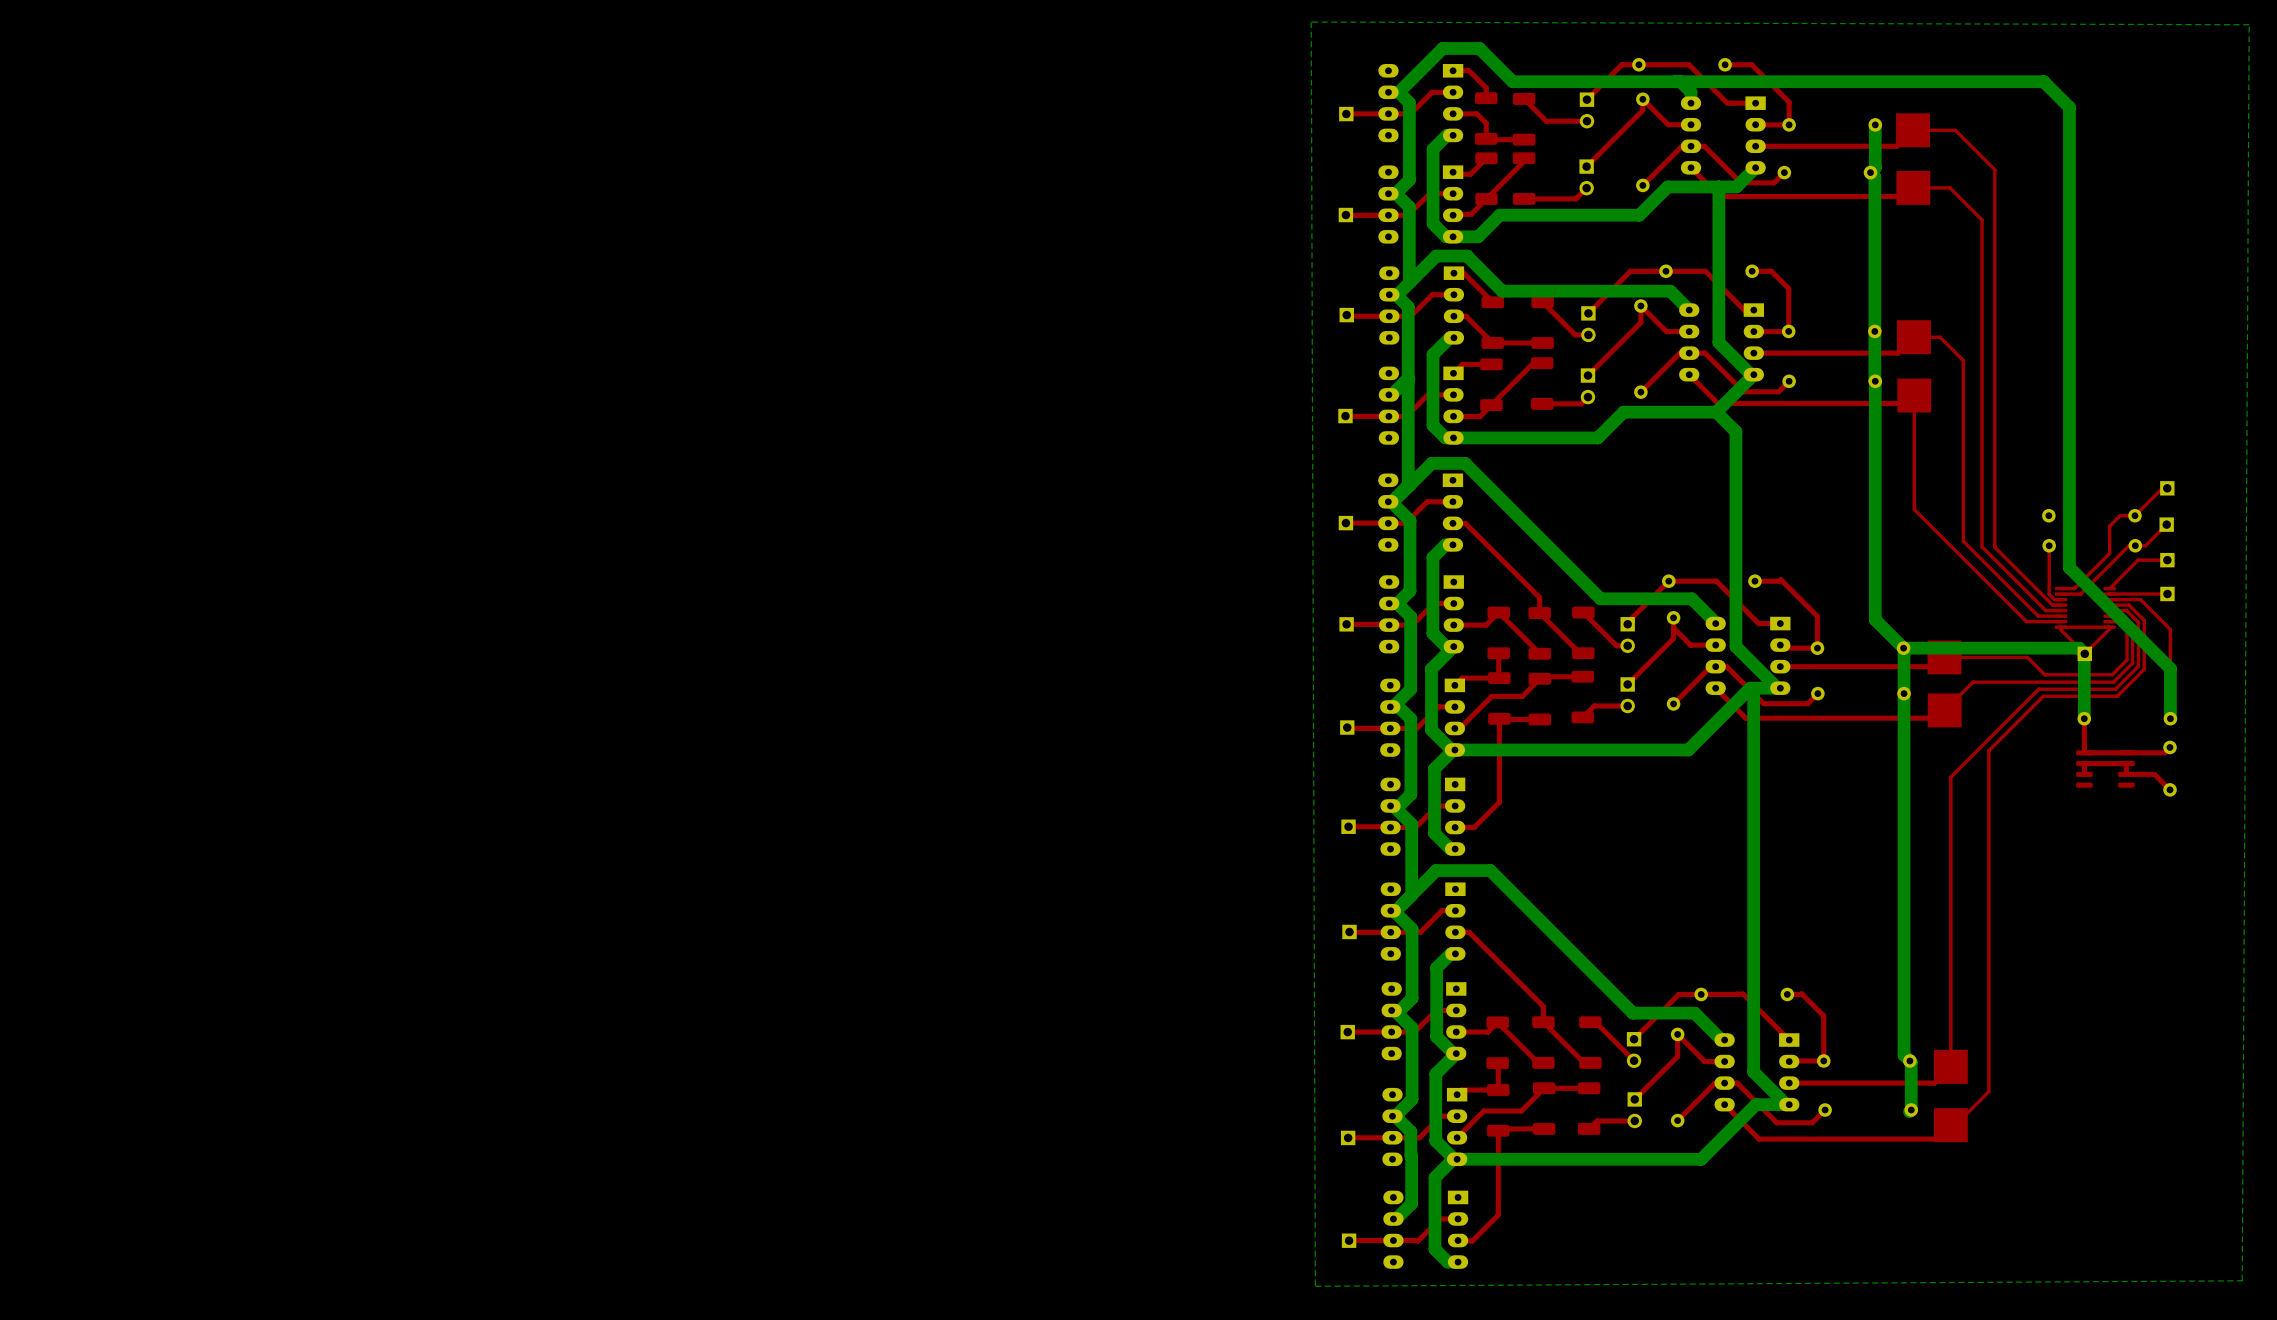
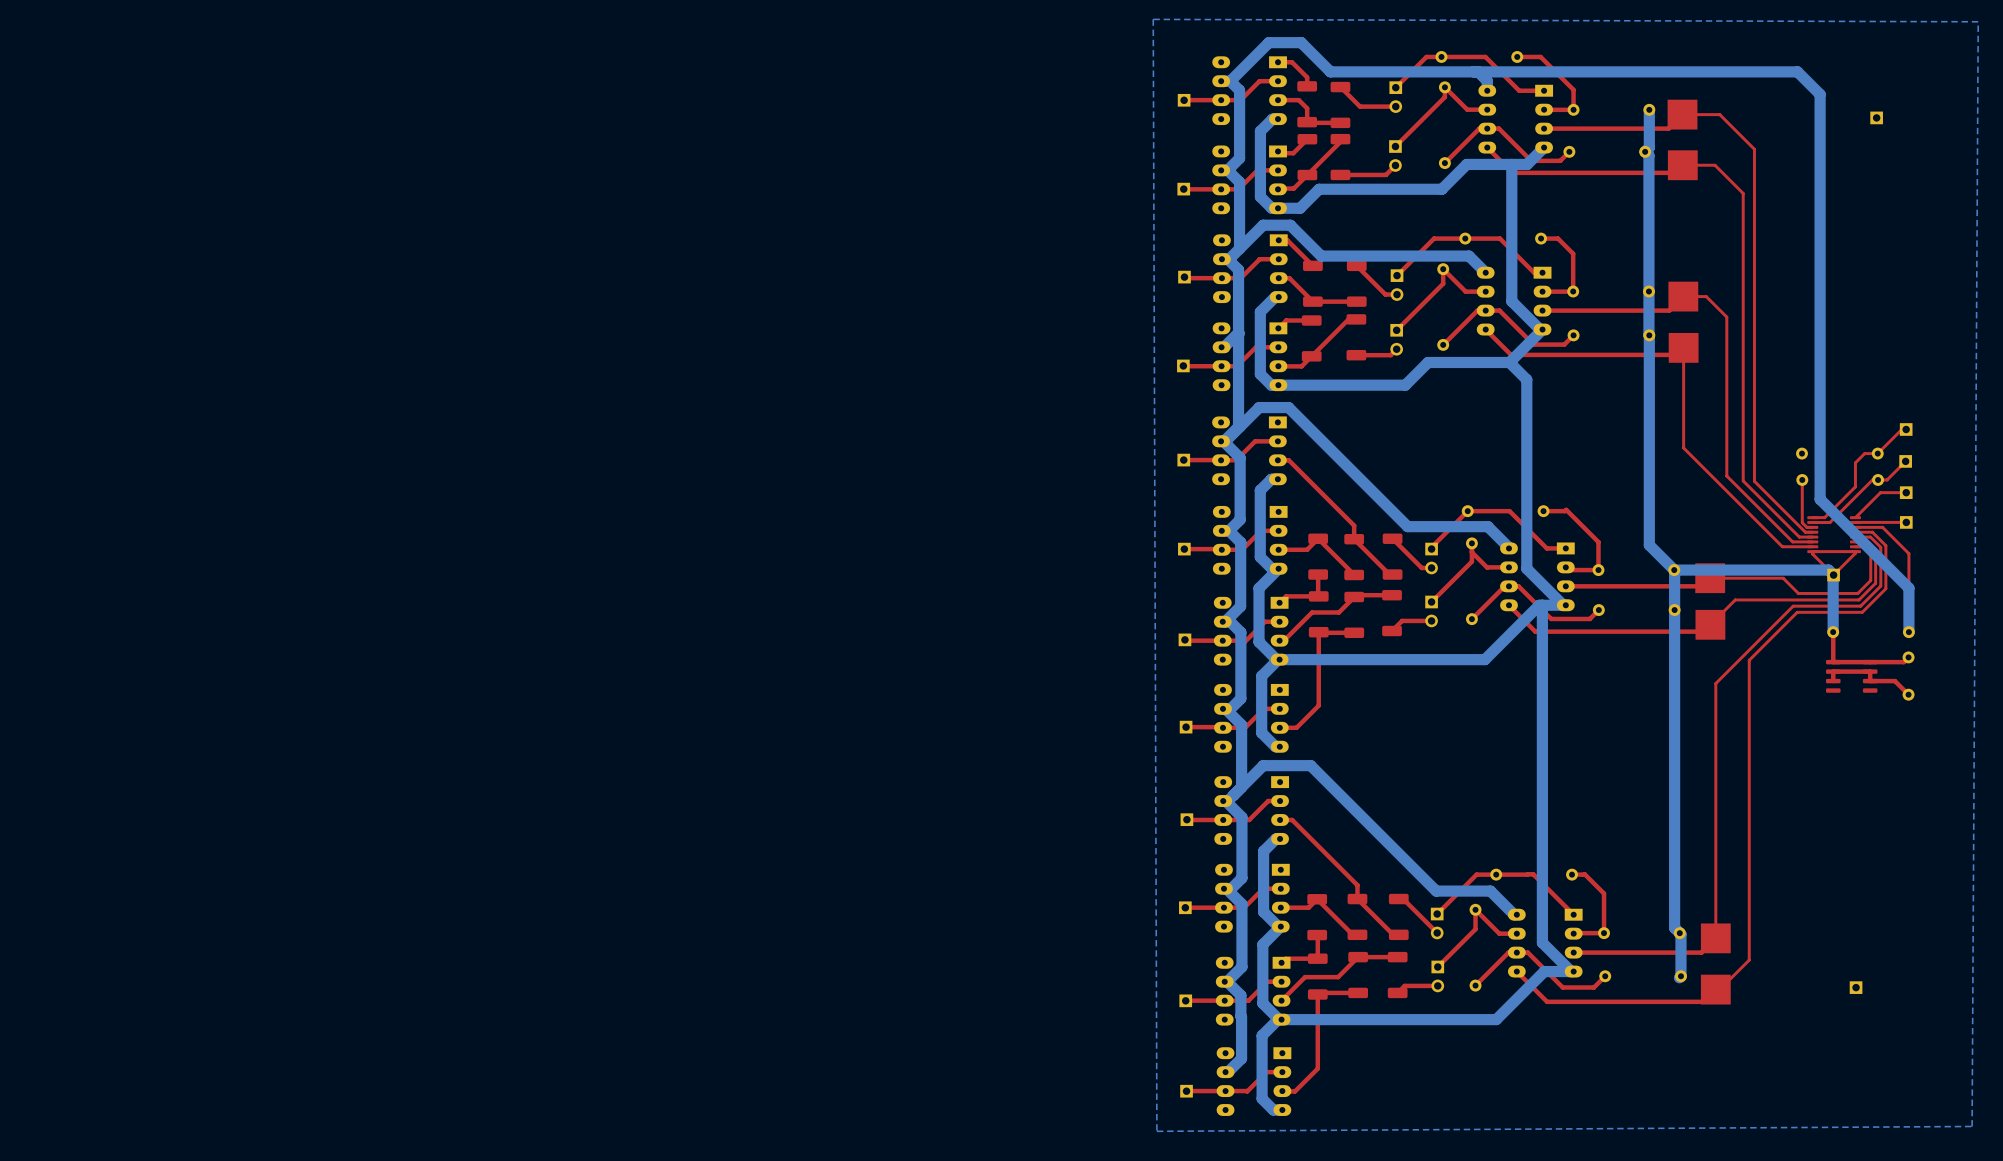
part: none -> (1876, 117)
part: none -> (1856, 987)

